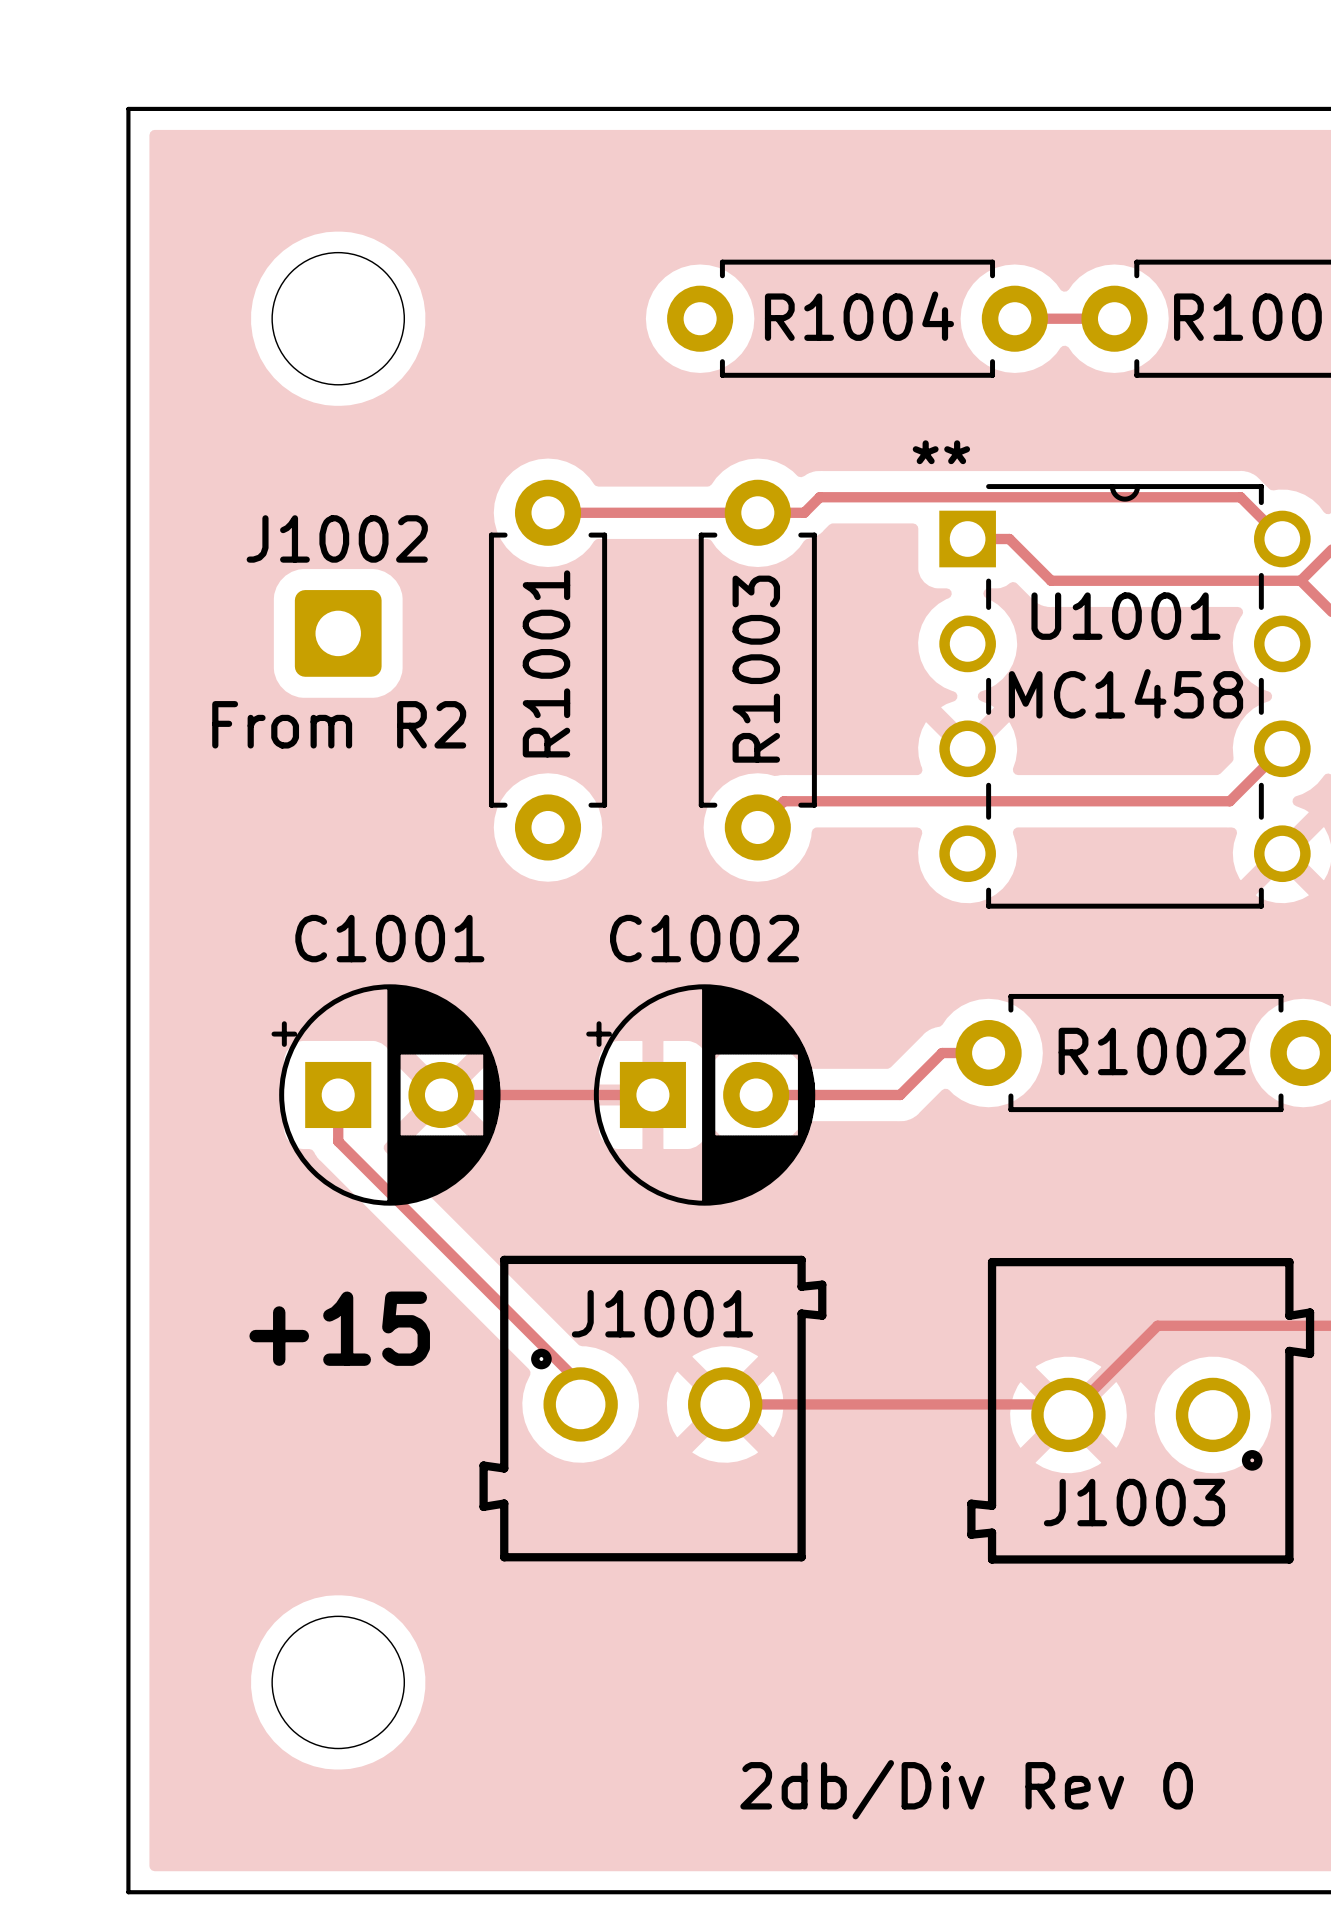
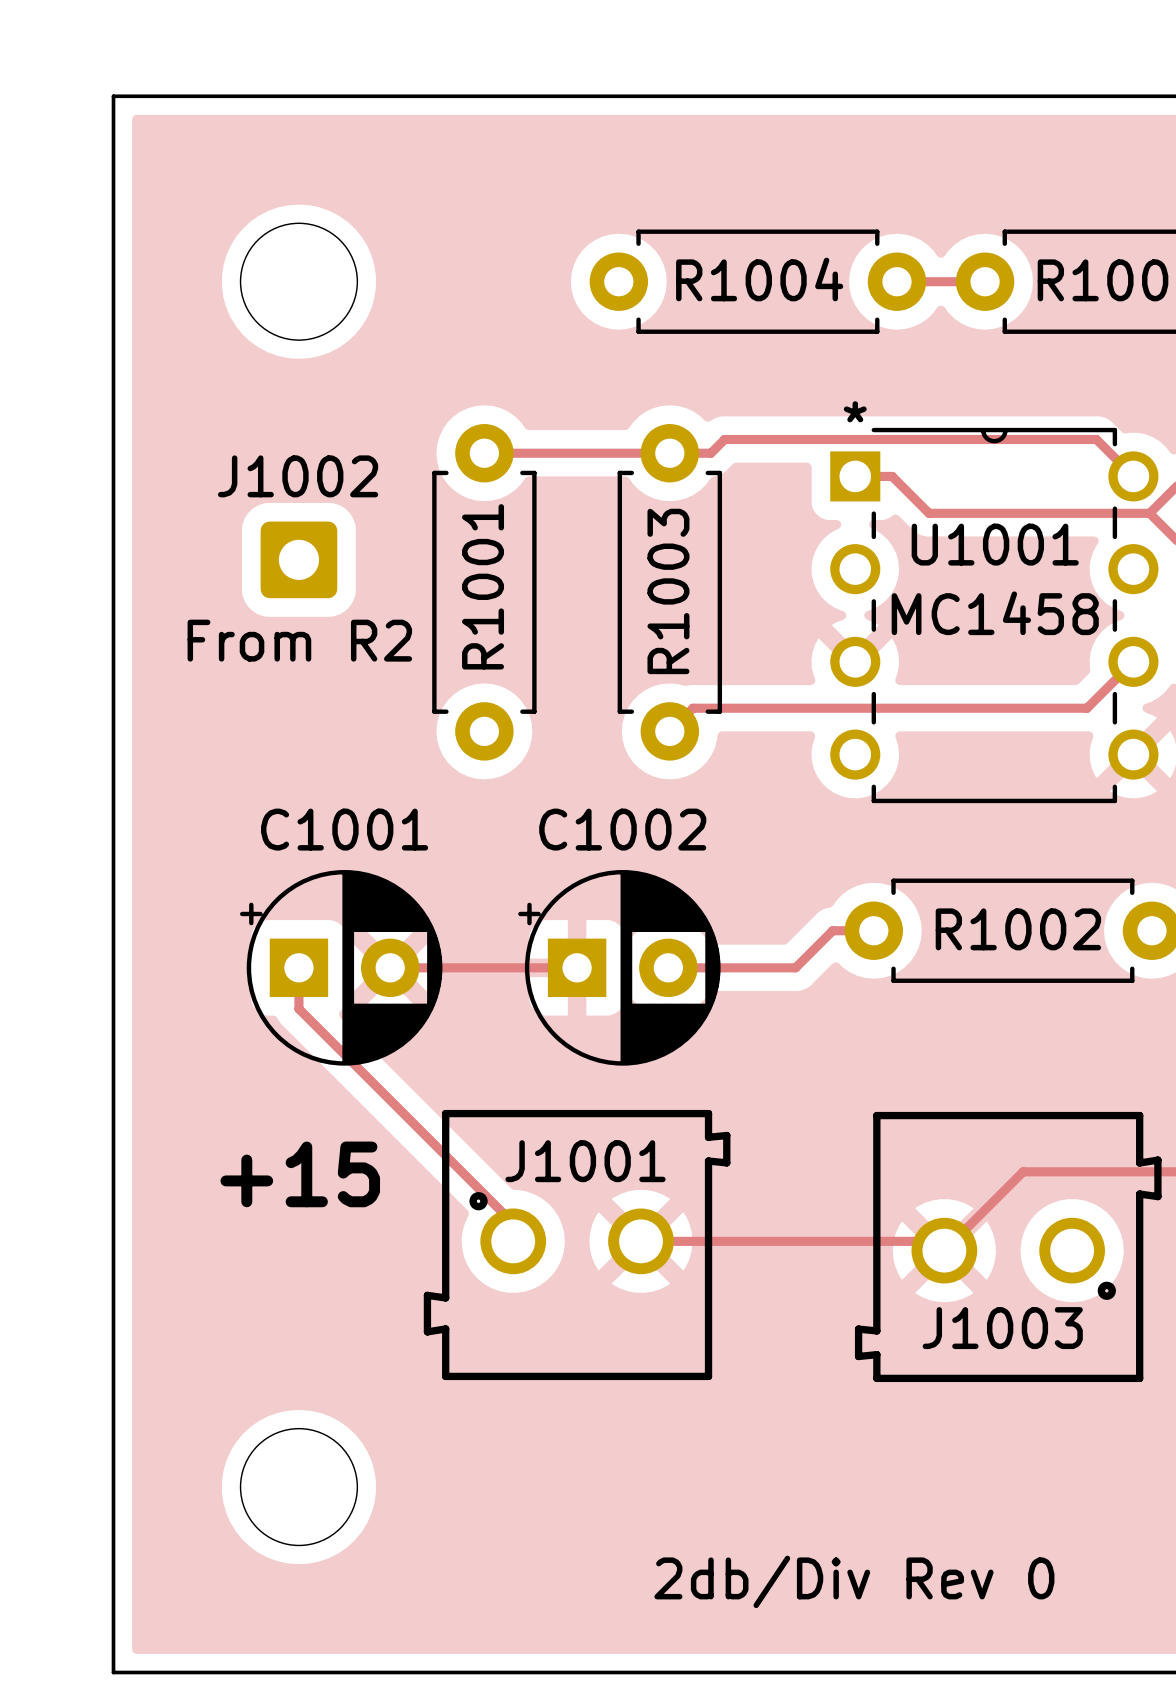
U1001 text position: * (925, 452) -> * (855, 411)
U1001 text: * (957, 452) -> none

